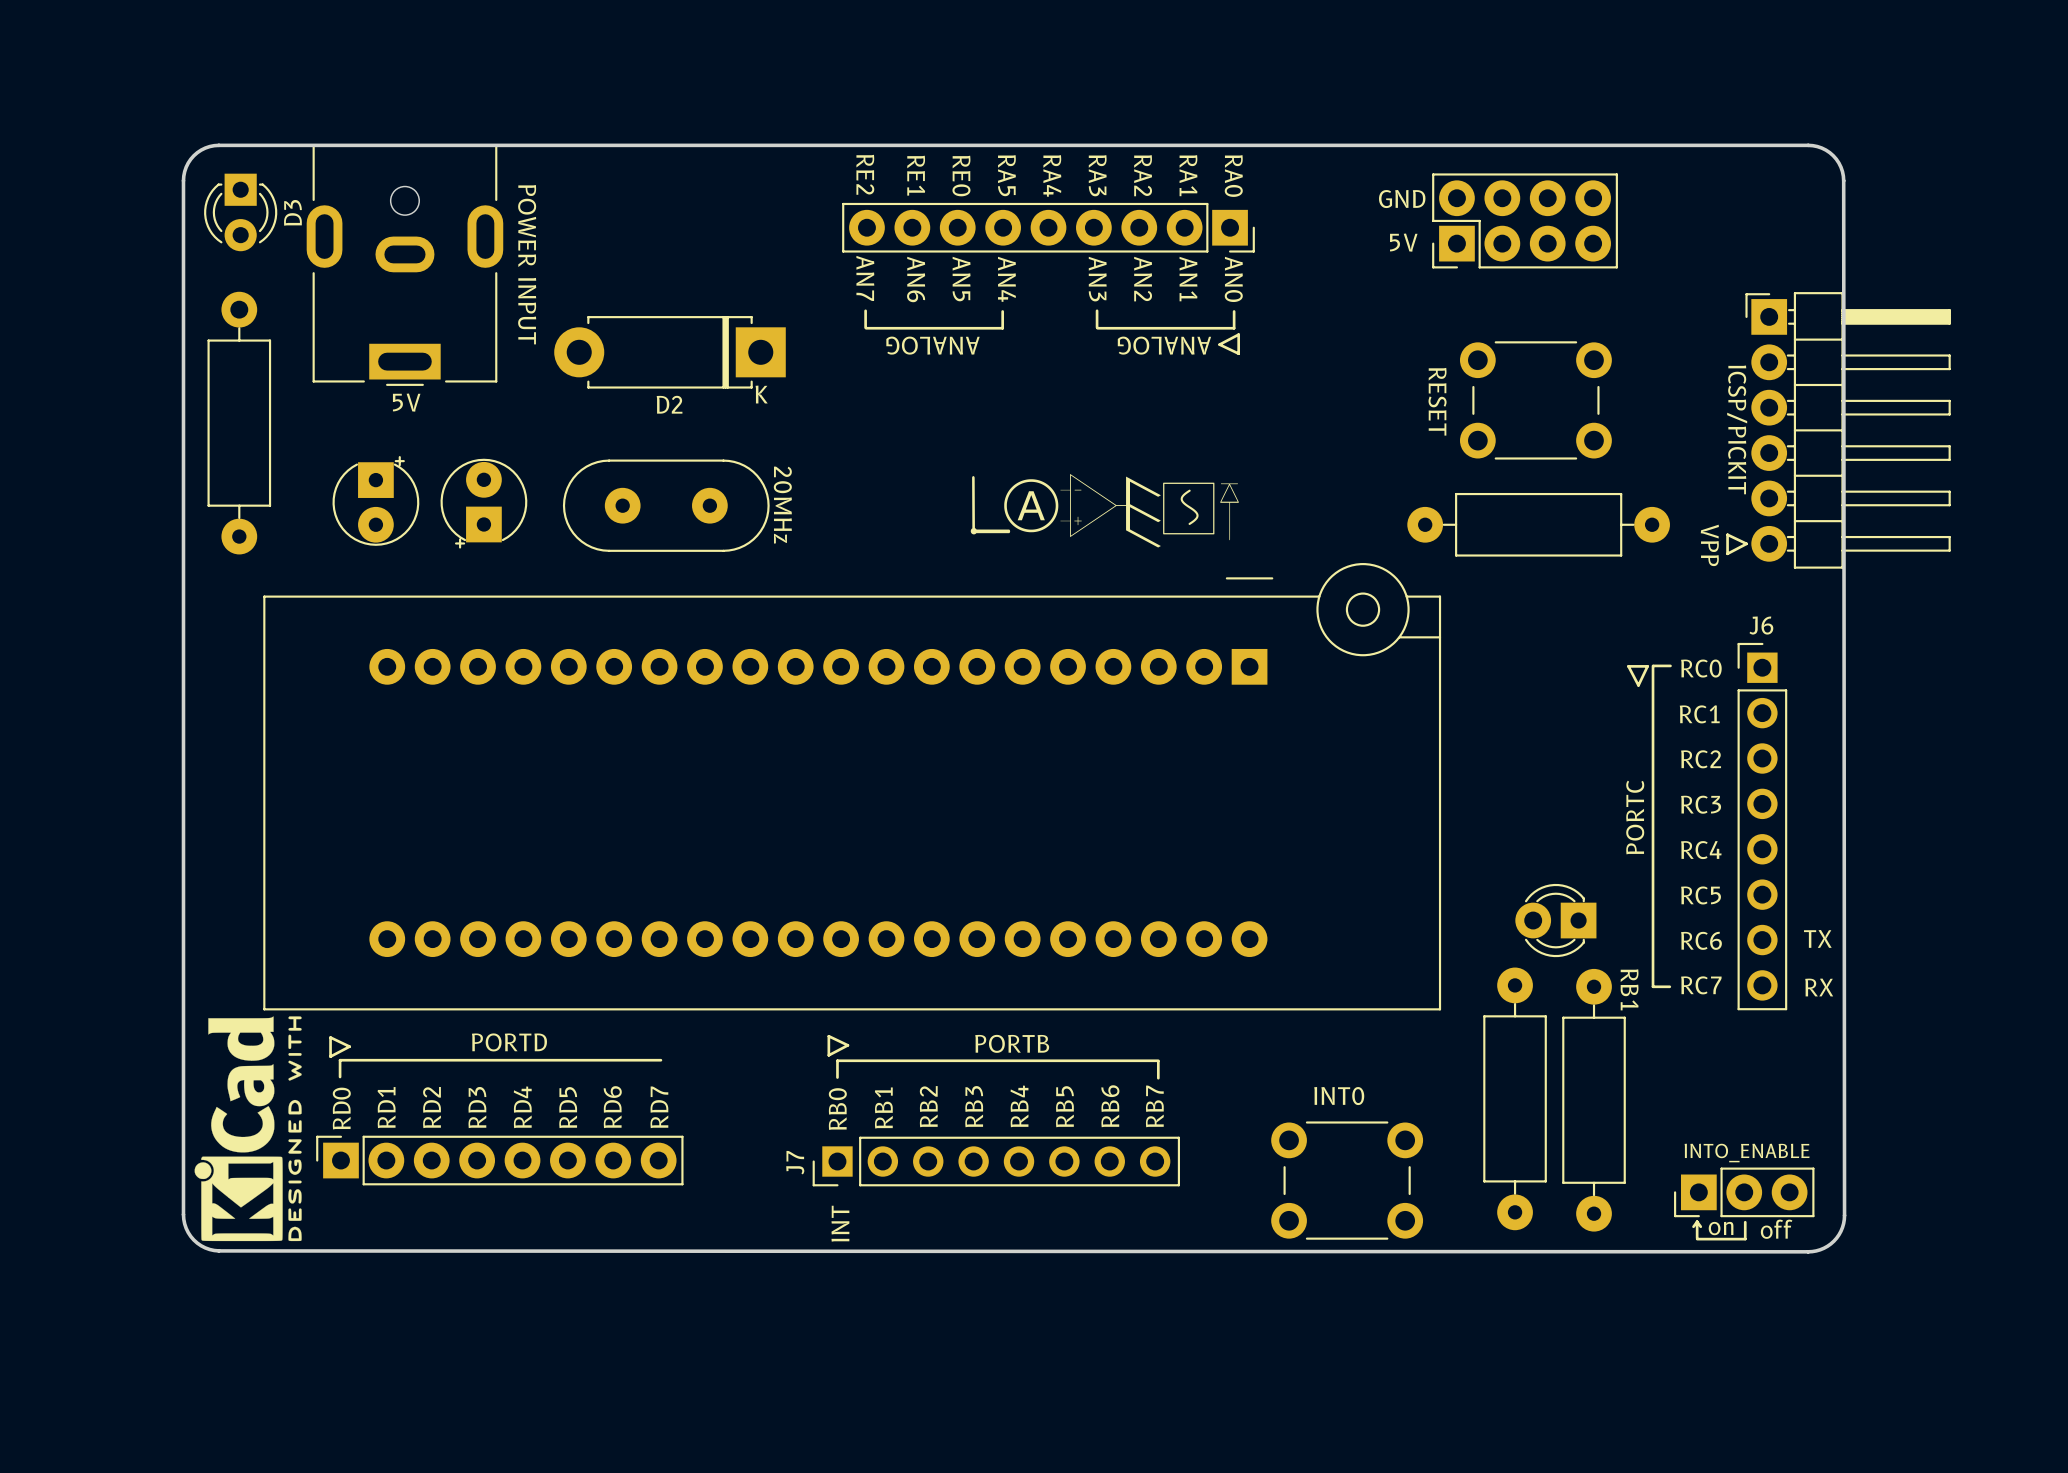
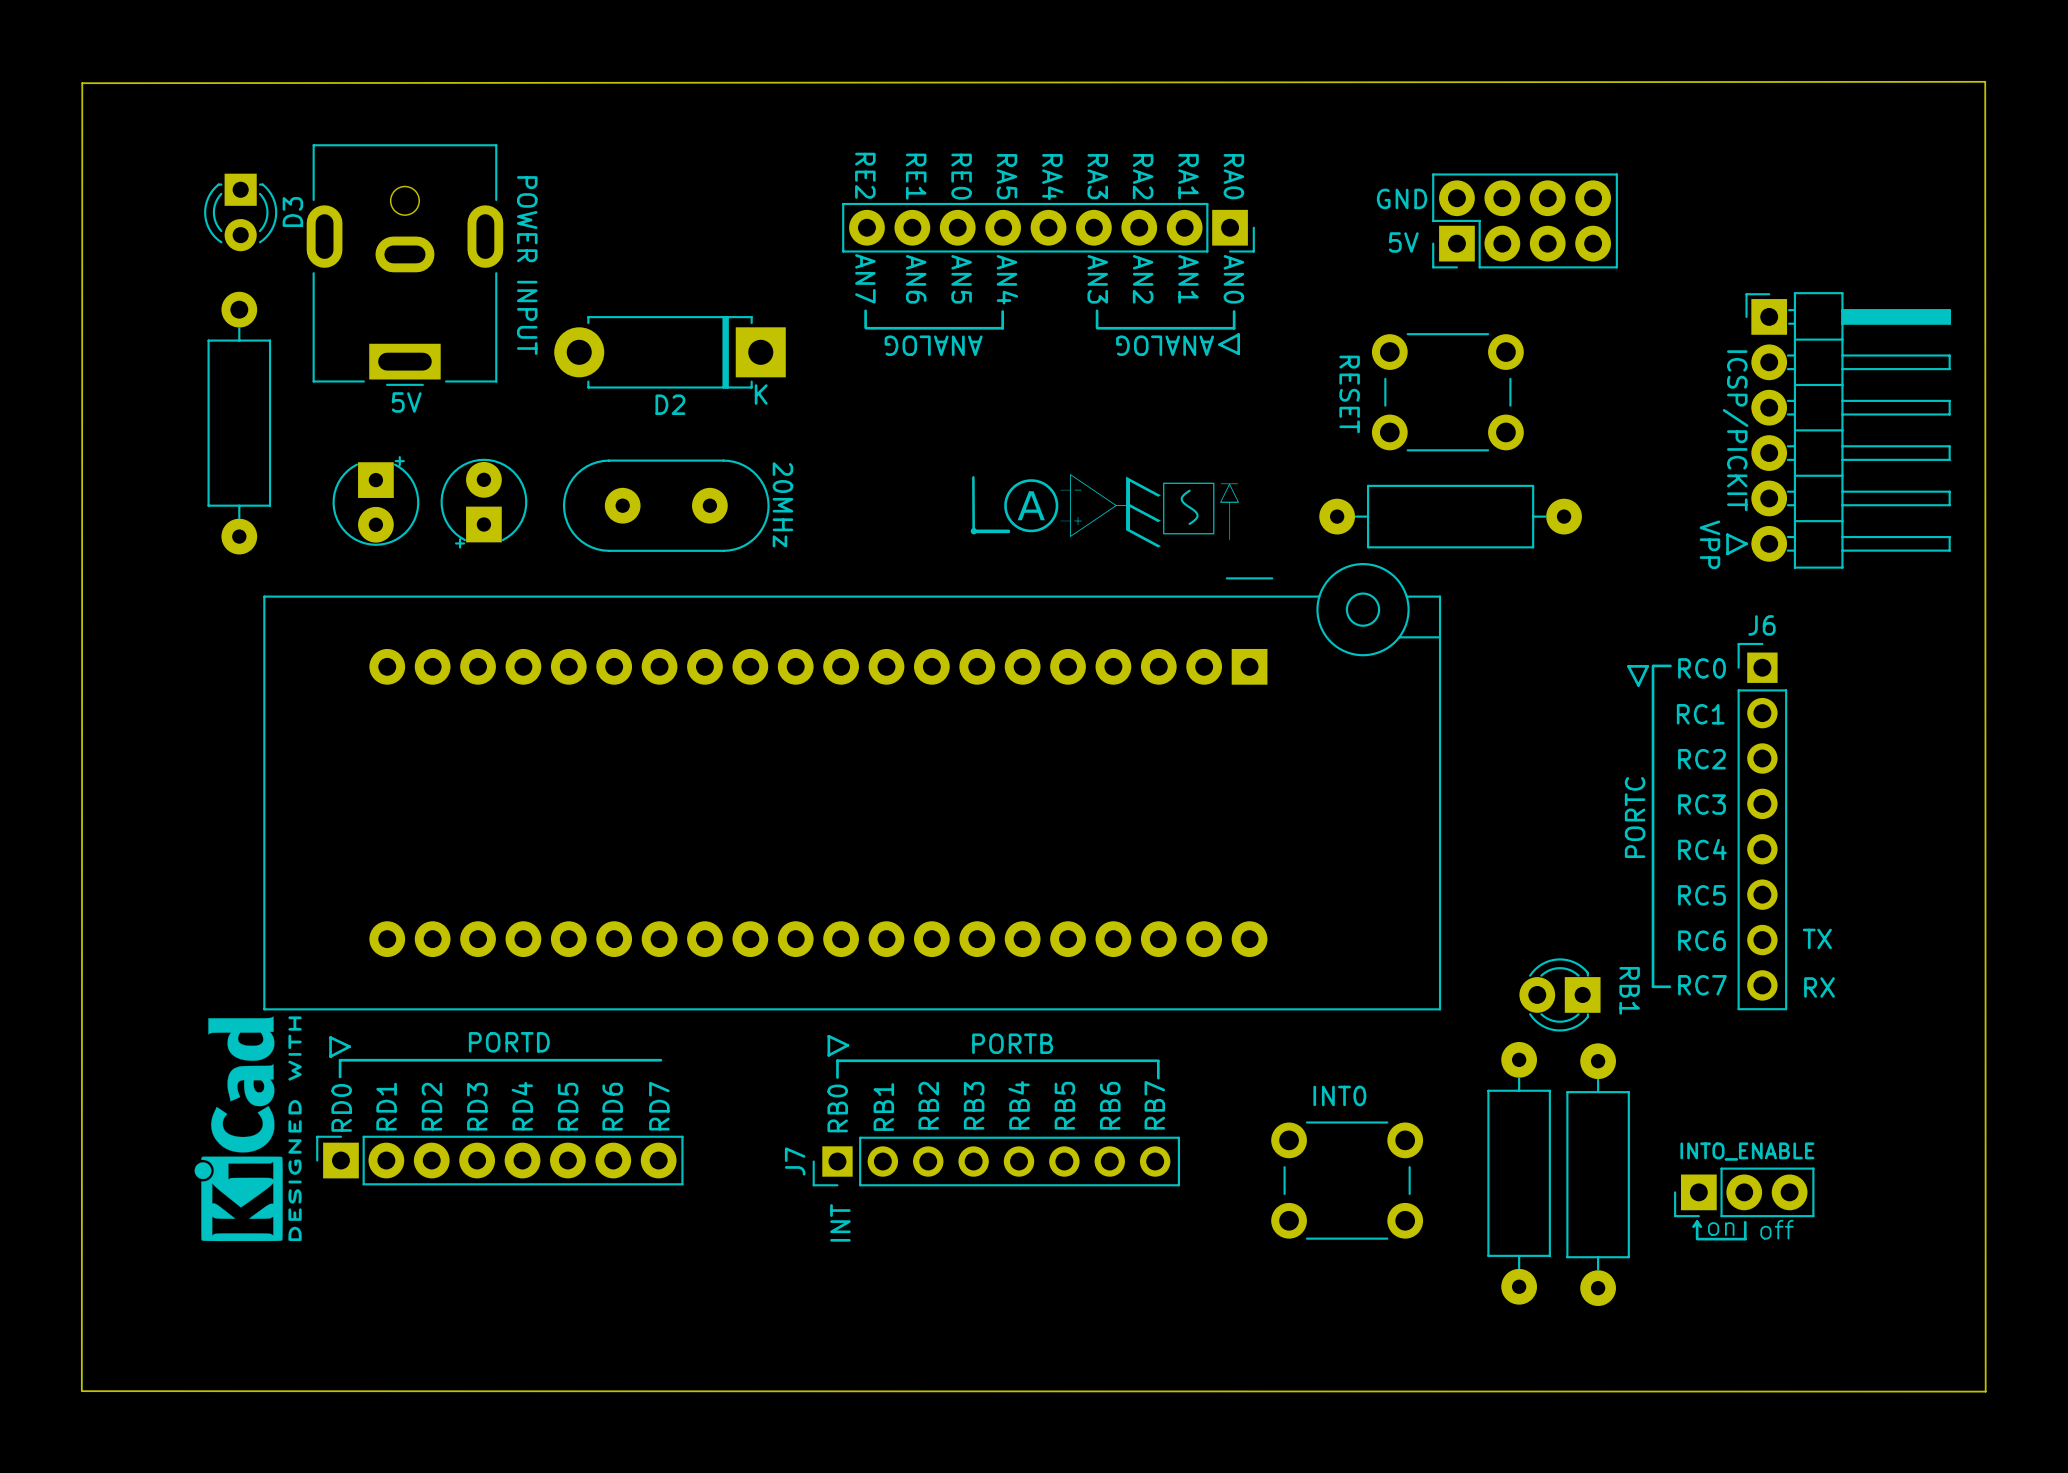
board edge: (218, 145) (1808, 145) (1821, 148) (1829, 152) (1838, 163) (1843, 180) (1844, 1215) (1838, 1234) (1823, 1248) (1808, 1251) (218, 1250) (201, 1245) (188, 1232) (183, 1214) (183, 180) (186, 167) (193, 155) (205, 148) (218, 145) -> none
part position: (1535, 400) -> (1447, 392)
text position: RESET (1437, 401) -> RESET (1349, 394)
part position: (1538, 524) -> (1450, 516)
part position: (1555, 920) -> (1559, 994)
part: (1515, 1098) -> none
part: (1594, 1100) -> none
part: none -> (1519, 1173)
part: none -> (1598, 1174)
board edge: none -> (81, 1391) (82, 83) (1985, 81) (1985, 1391) (82, 1391)

